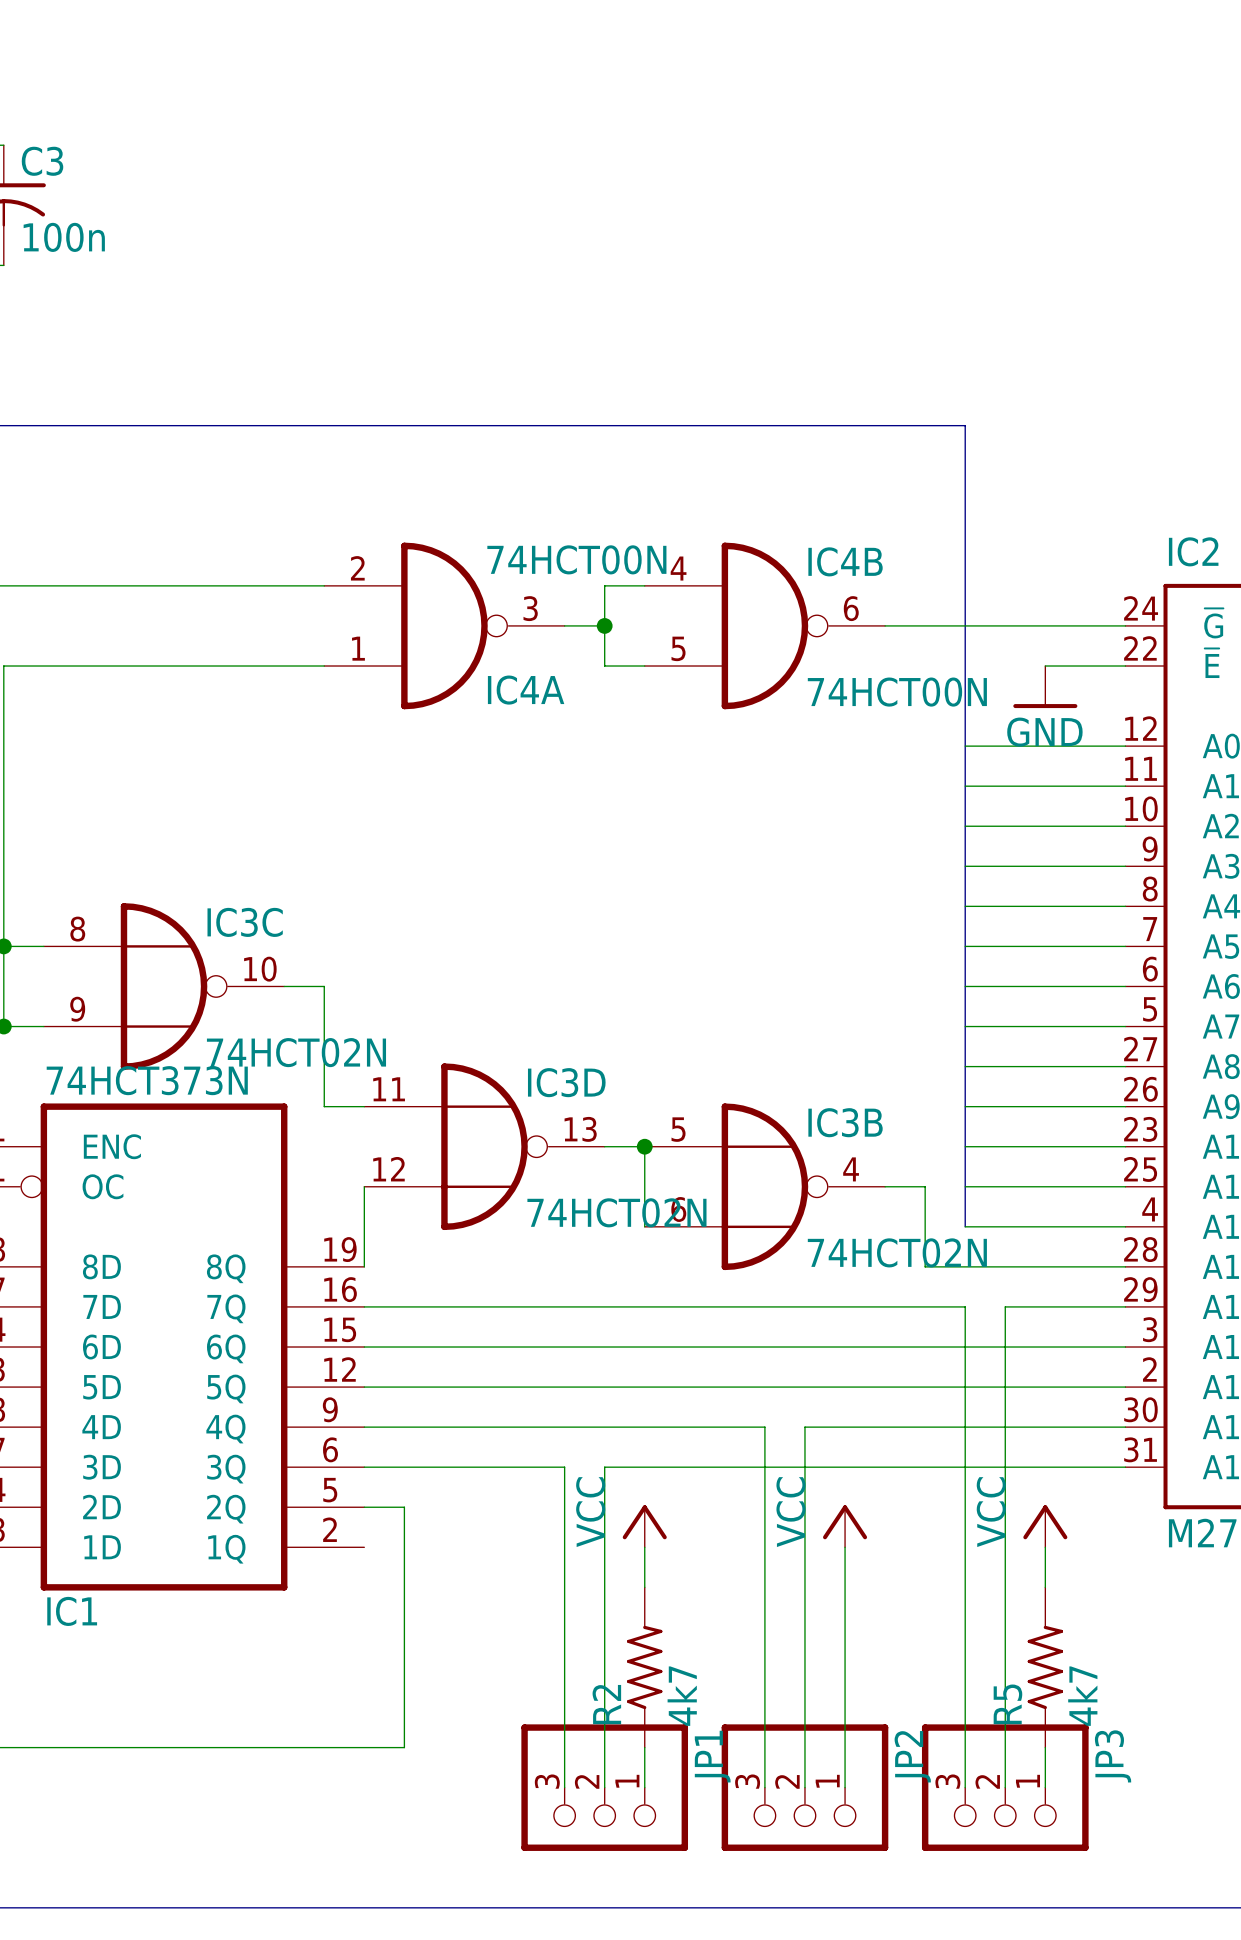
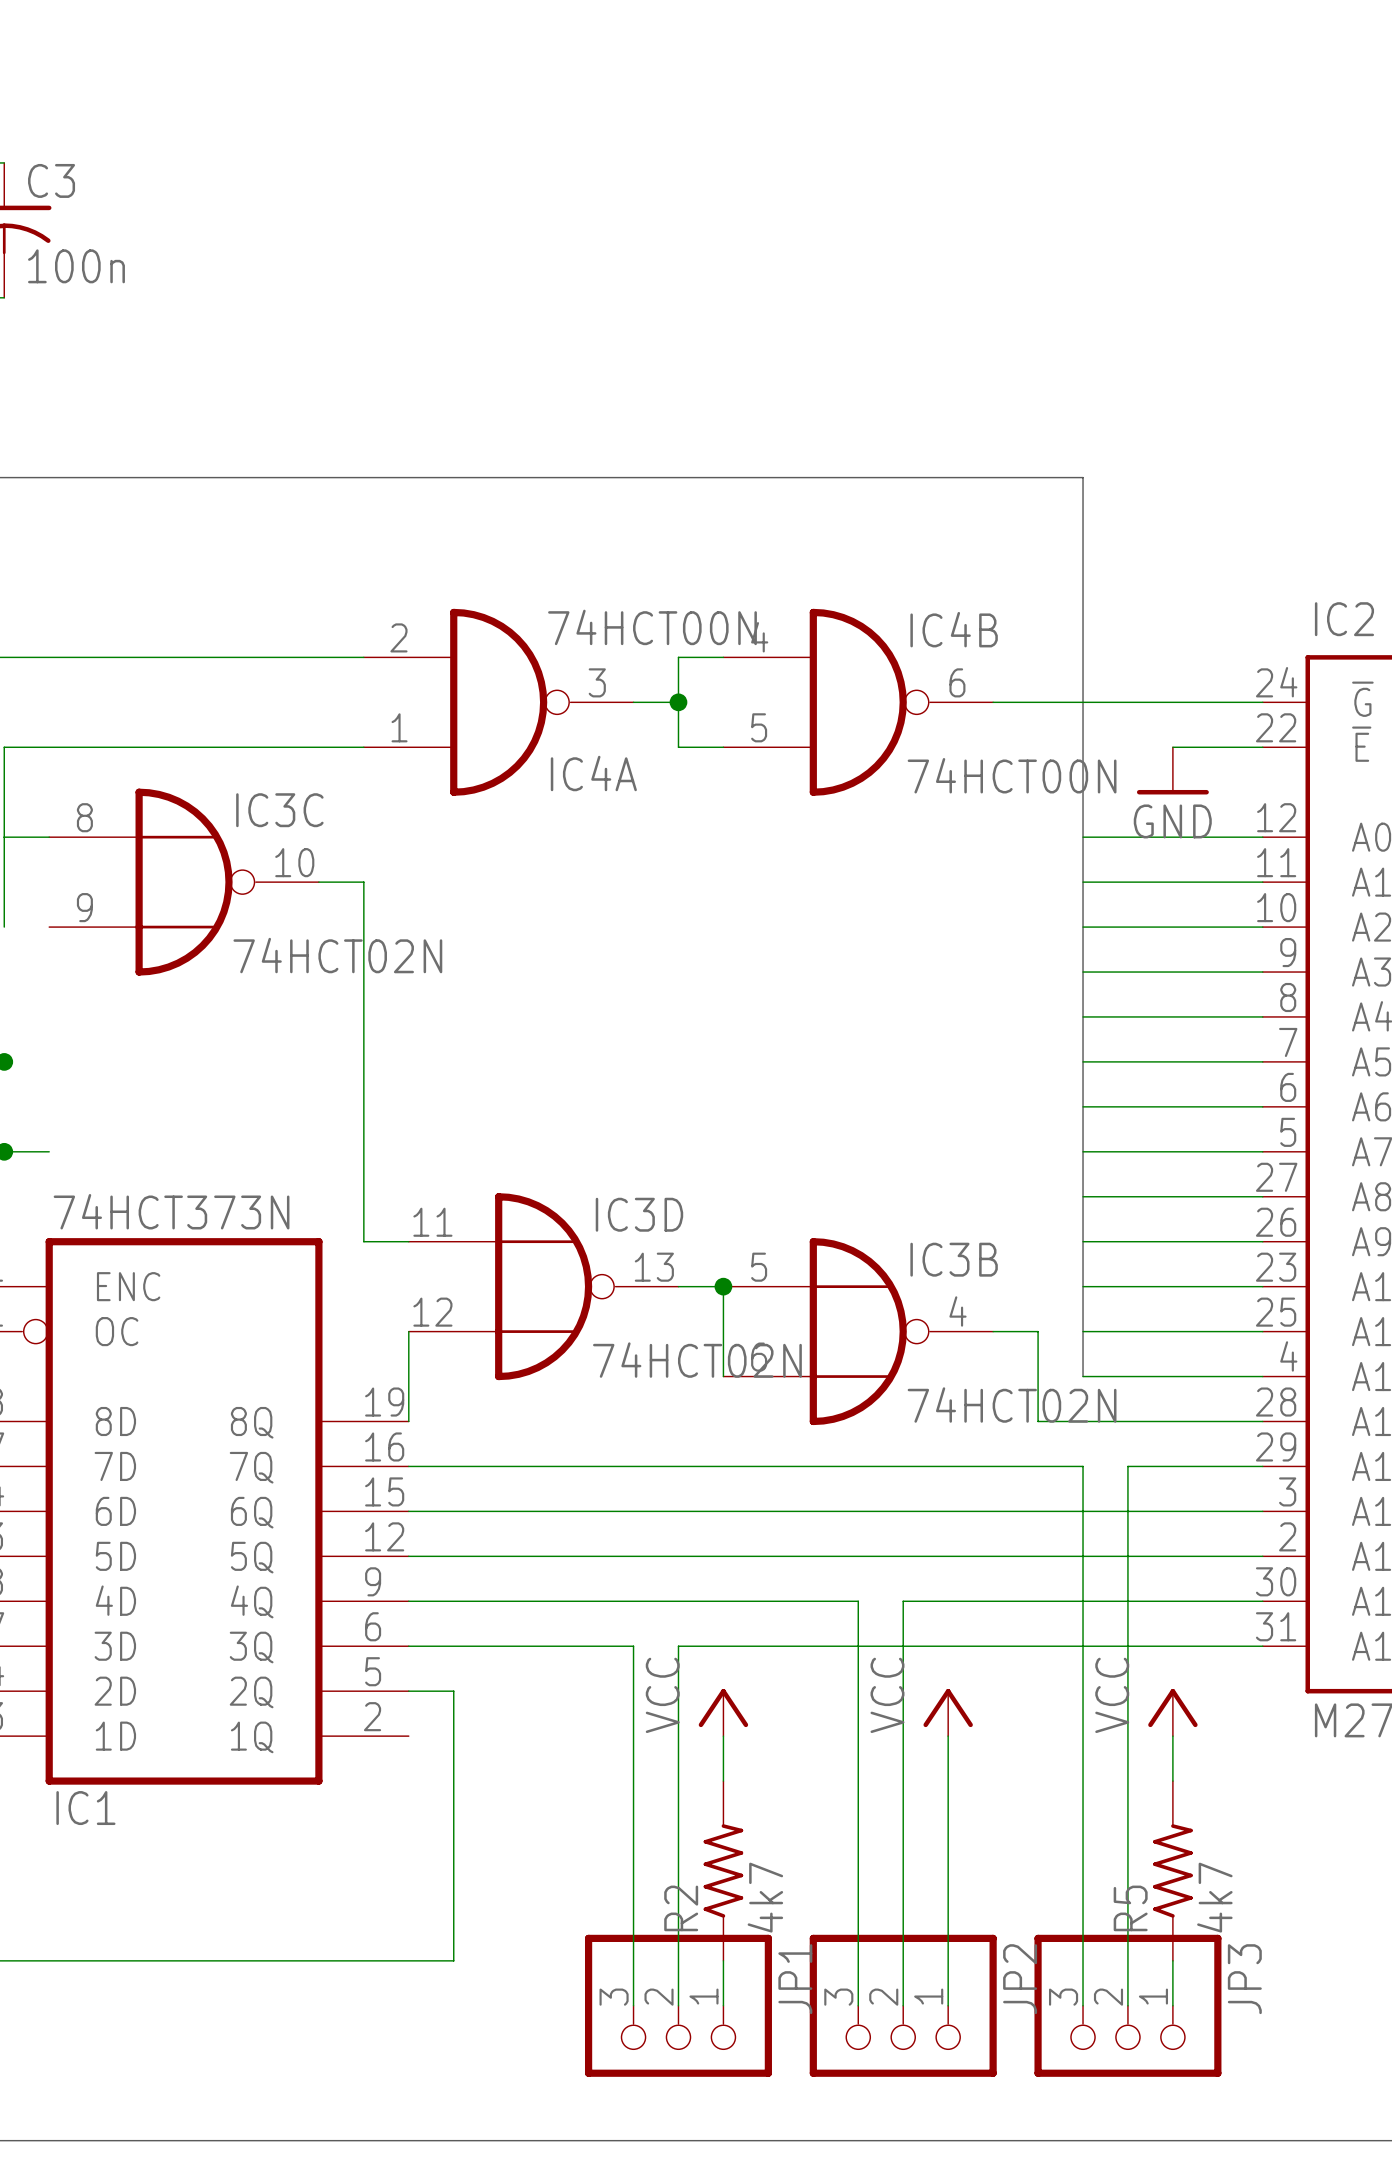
wire: (3, 826) (3, 1026) -> none
wire: (3, 946) (43, 946) -> (4, 837) (49, 837)
IC3C position: (164, 986) -> (184, 882)
wire: (284, 986) (324, 986) -> (318, 882) (363, 882) (363, 1106)

